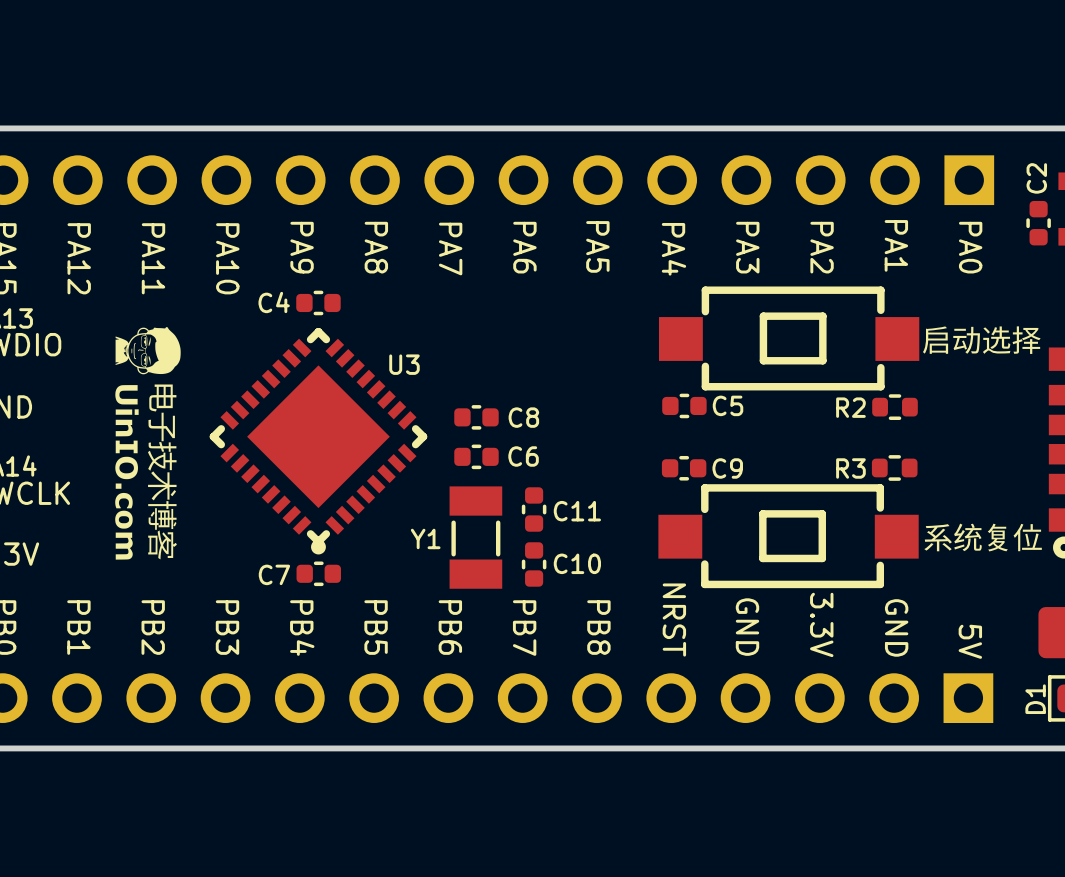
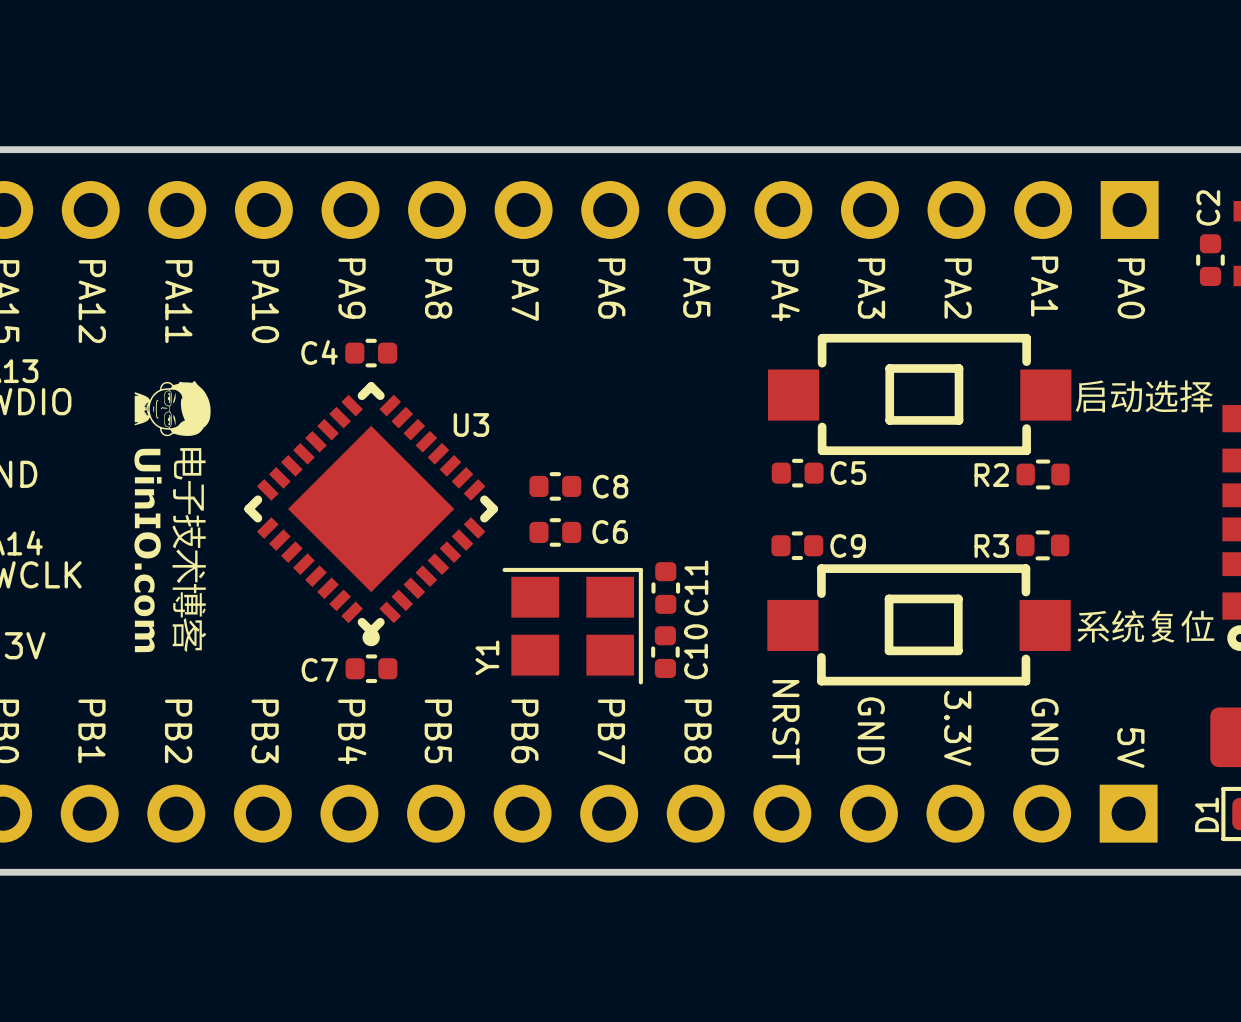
Y1 footprint: [449, 486, 503, 589] -> [502, 567, 643, 685]
C11 position: (534, 509) -> (665, 588)
C11 name rotation: 0° (577, 511) -> 90° counterclockwise (696, 588)
C10 name rotation: 0° (577, 563) -> 90° counterclockwise (696, 651)
C10 position: (534, 564) -> (665, 652)

